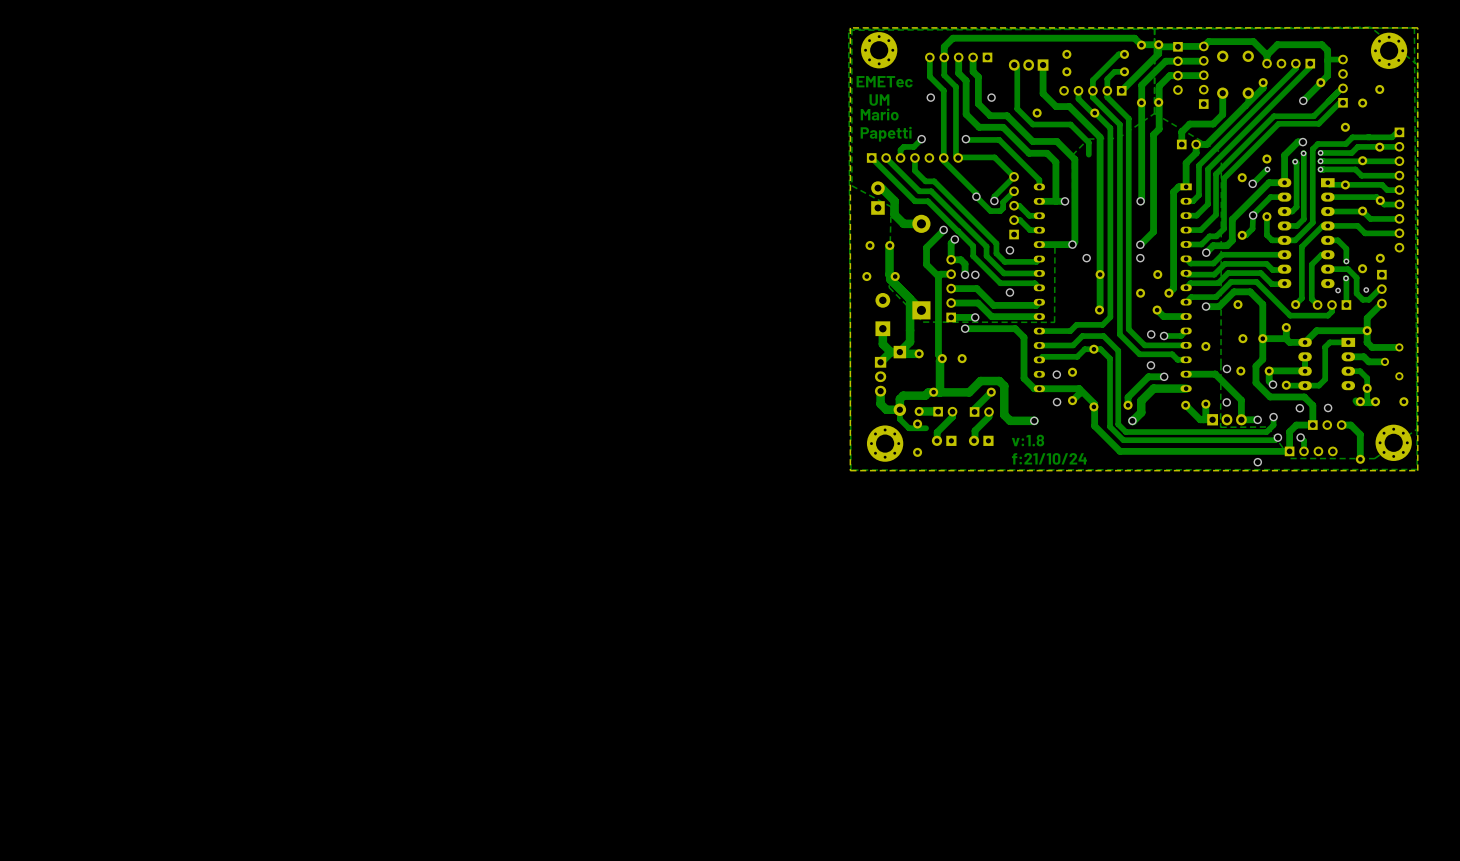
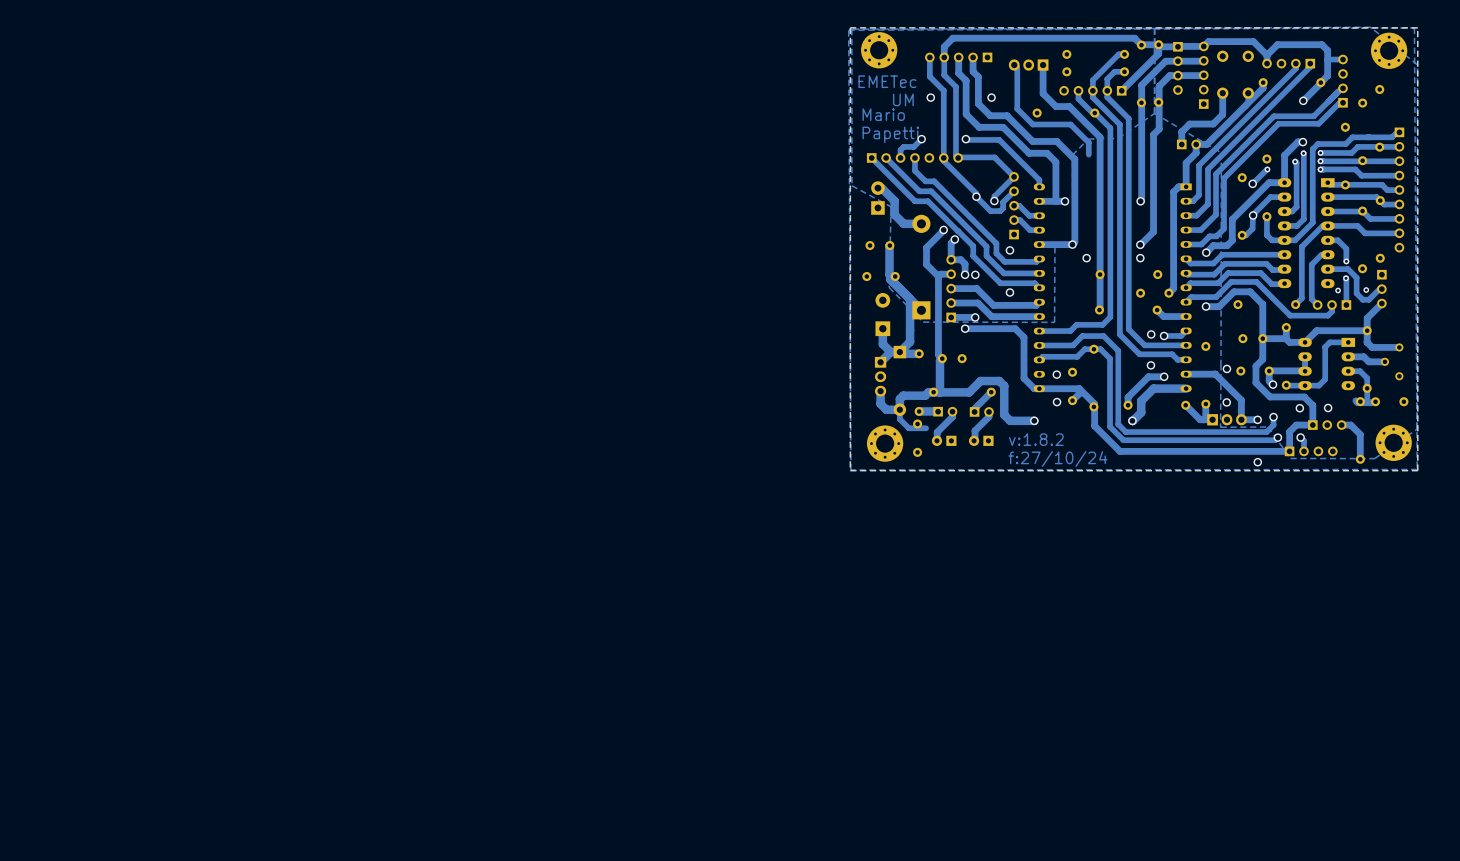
text: v:1.8 (1028, 440) -> v:1.8.2 (1036, 439)
text: f:21/10/24 (1049, 458) -> f:27/10/24 (1057, 458)

